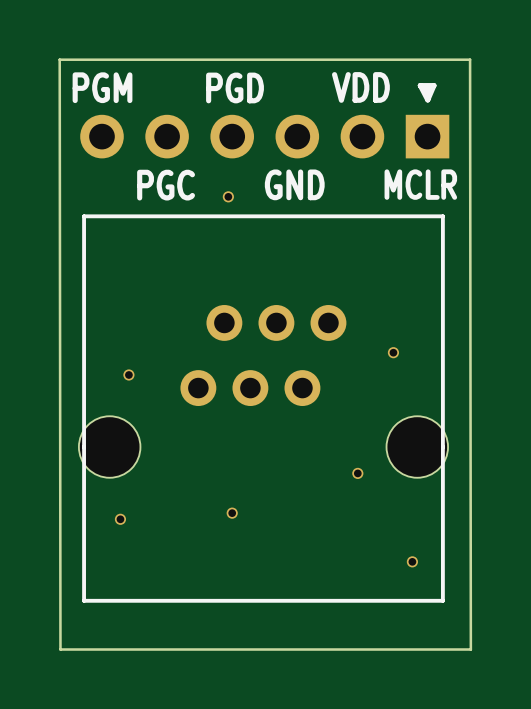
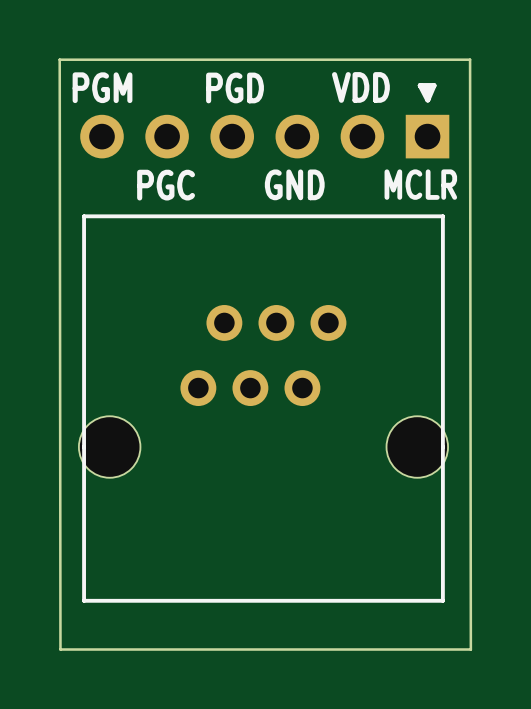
part: (228, 196) -> none
part: (393, 352) -> none
part: (128, 374) -> none
part: (357, 473) -> none
part: (232, 513) -> none
part: (120, 519) -> none
part: (412, 561) -> none

